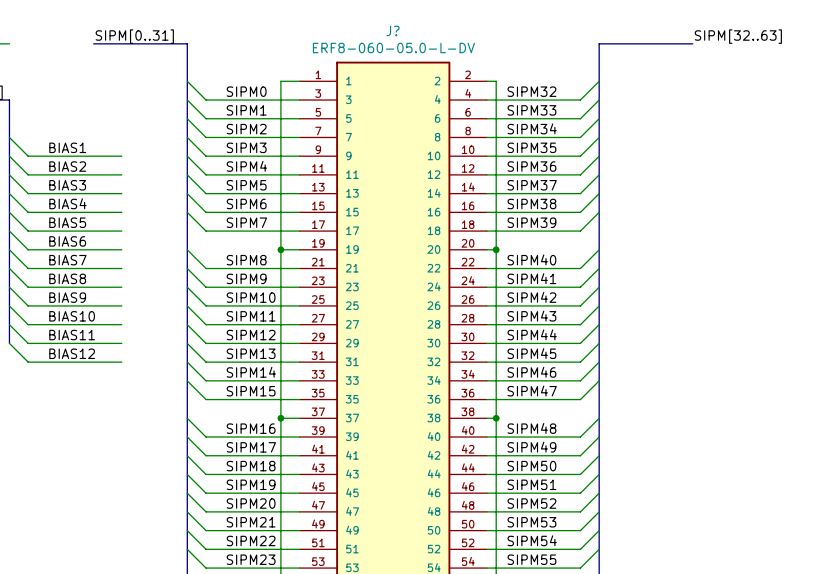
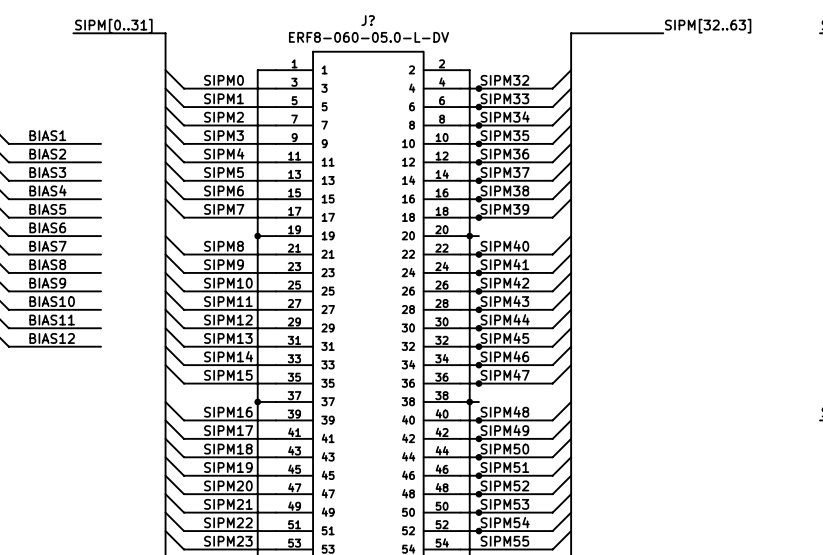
junction: none -> (478, 88)
junction: none -> (478, 107)
junction: none -> (478, 125)
junction: none -> (478, 143)
junction: none -> (478, 162)
junction: none -> (478, 180)
junction: none -> (478, 199)
junction: none -> (478, 217)
wire: none -> (469, 236) (478, 236)
junction: none -> (478, 254)
junction: none -> (478, 272)
junction: none -> (478, 291)
junction: none -> (478, 309)
junction: none -> (478, 328)
junction: none -> (478, 346)
junction: none -> (478, 365)
junction: none -> (478, 383)
wire: none -> (469, 402) (478, 402)
junction: none -> (478, 420)
junction: none -> (478, 438)
junction: none -> (478, 457)
junction: none -> (478, 475)
junction: none -> (478, 494)
junction: none -> (478, 512)
junction: none -> (478, 531)

